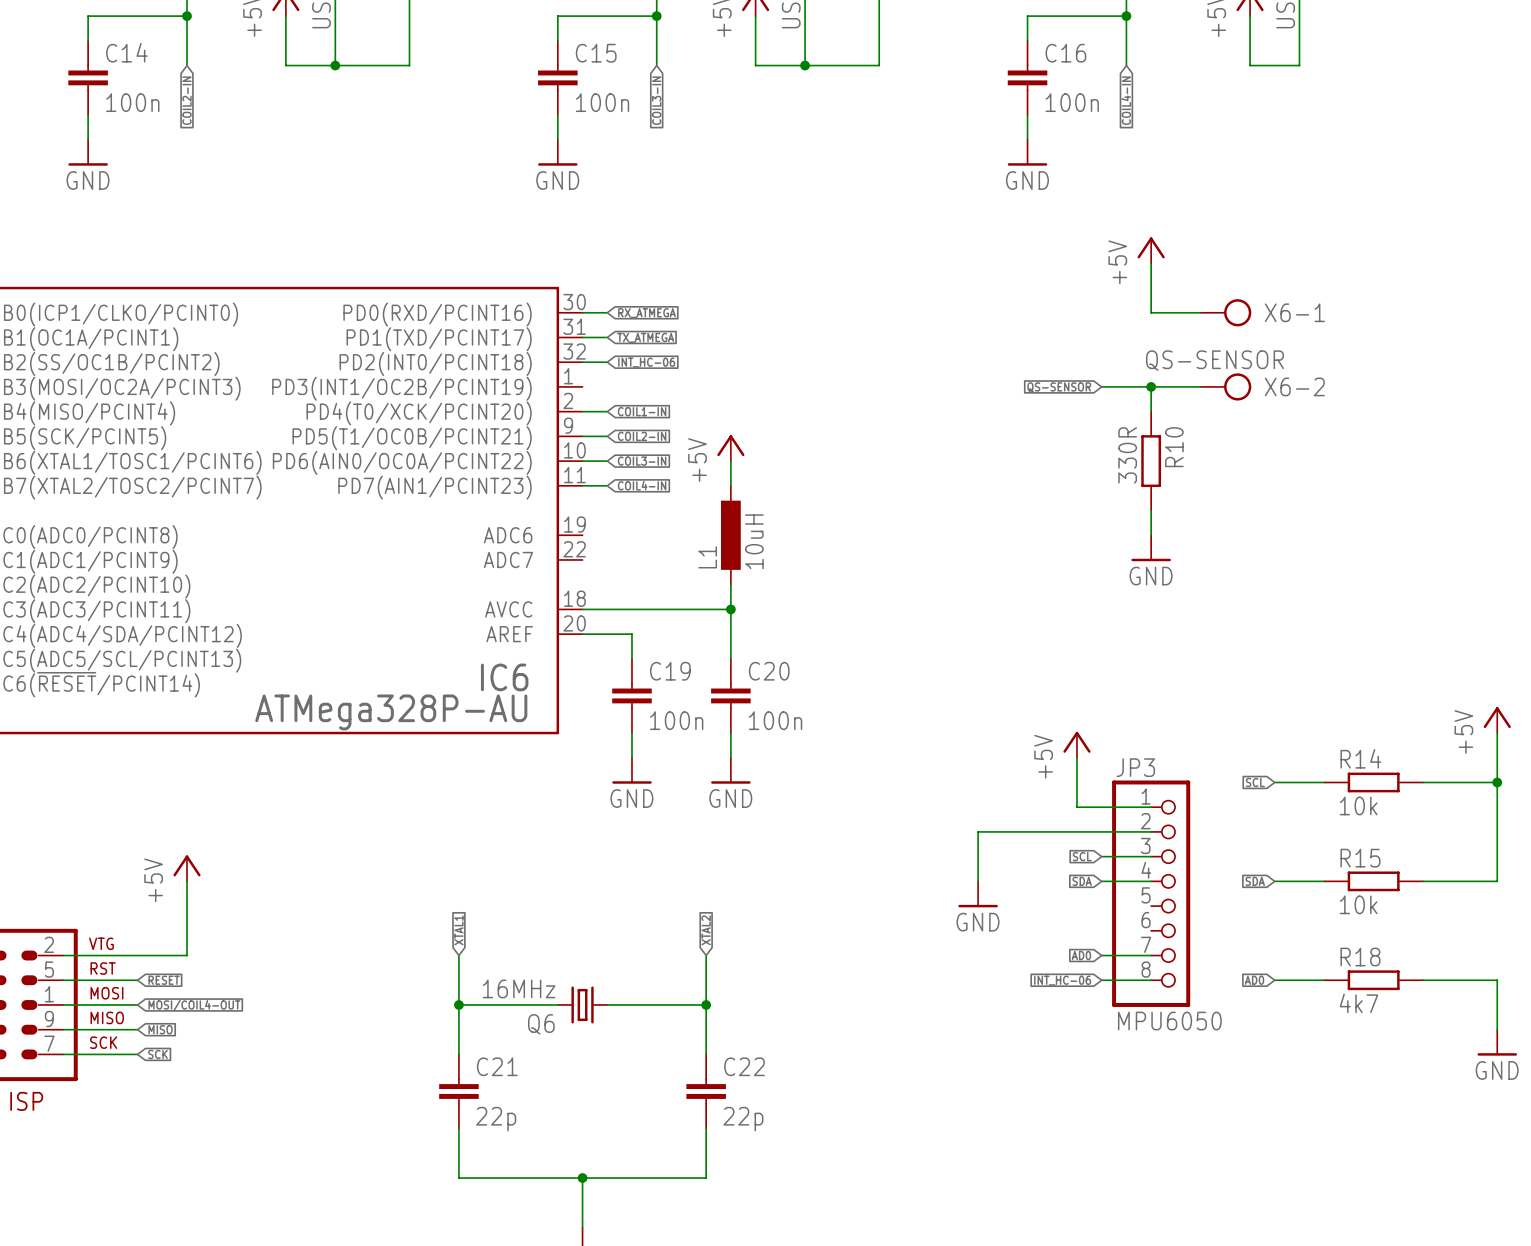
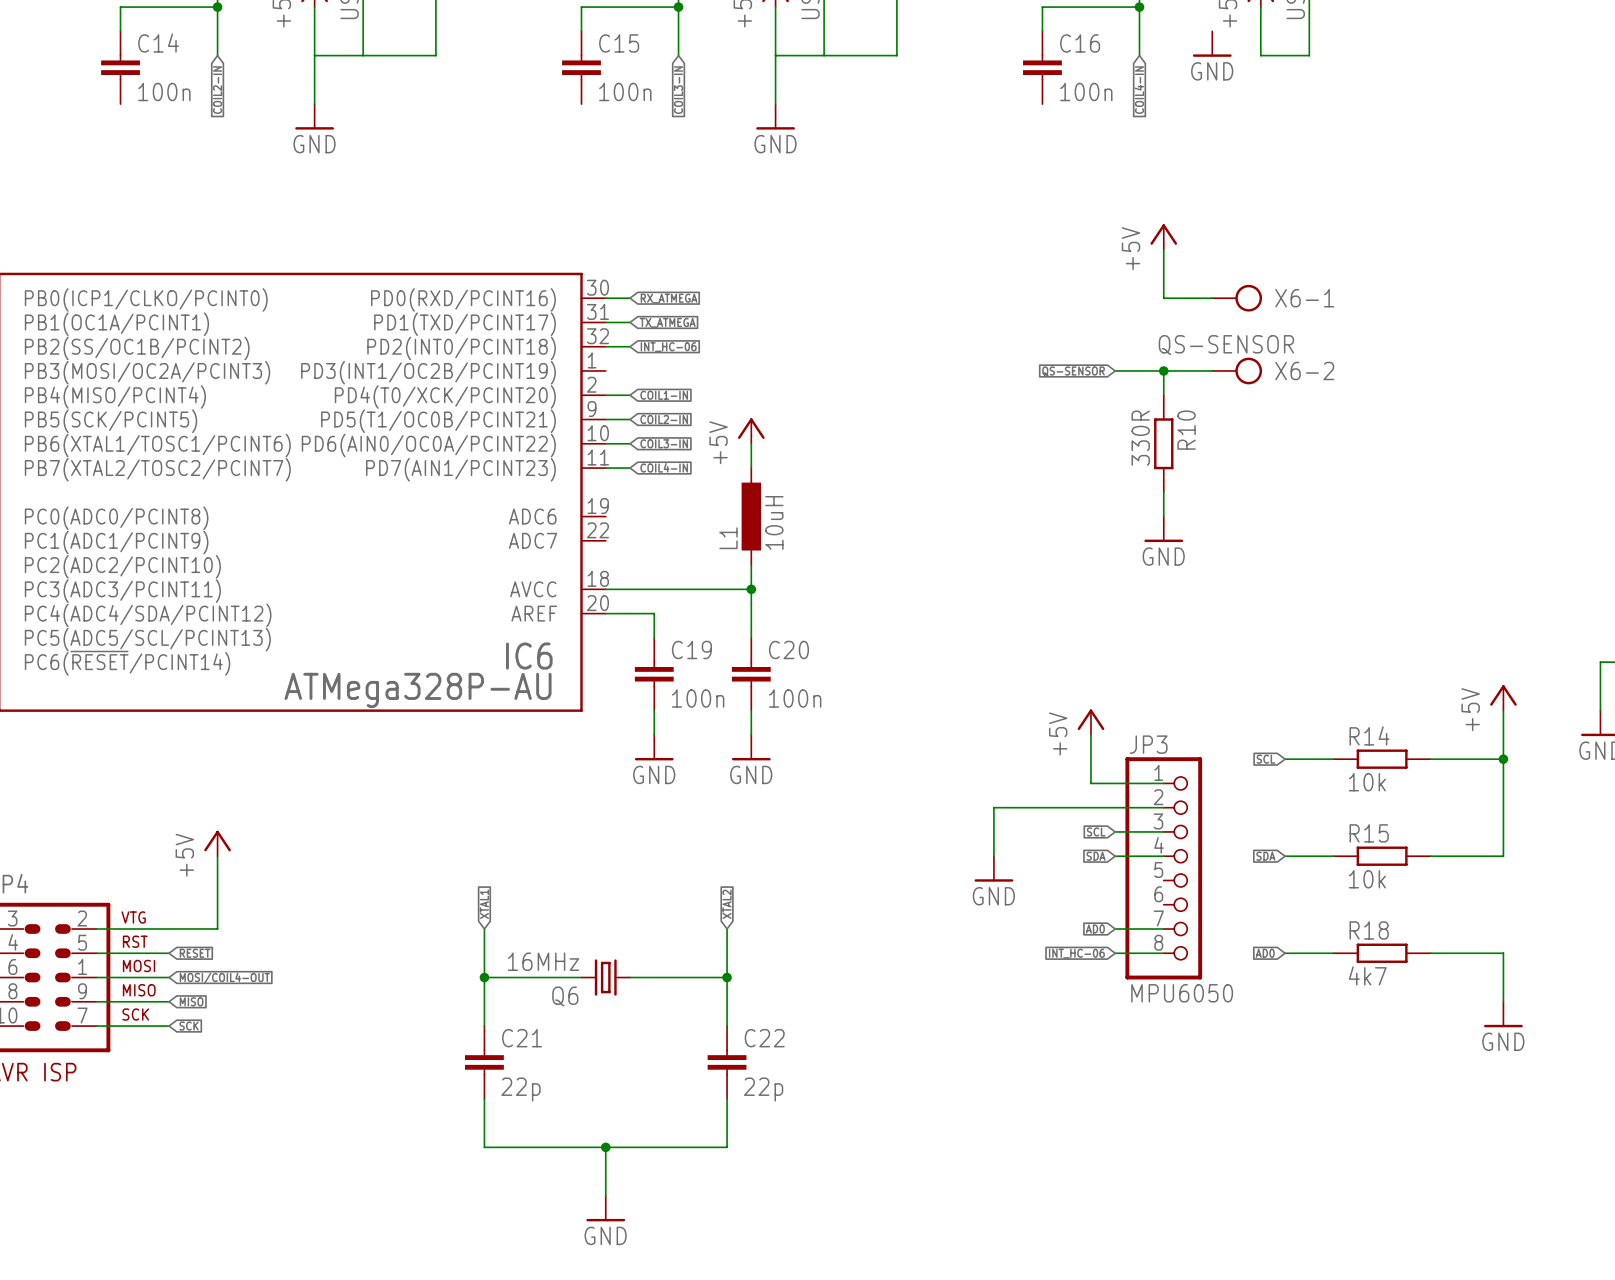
power symbol: none -> GND (1212, 44)
wire: none -> (314, 55) (314, 104)
junction: (335, 65) -> none
wire: none -> (775, 55) (775, 104)
junction: (805, 65) -> none
wire: (88, 114) (88, 139) -> none
wire: (557, 114) (557, 139) -> none
wire: (1027, 114) (1027, 139) -> none
power symbol: none -> GND (314, 116)
power symbol: none -> GND (775, 116)
power symbol: GND (88, 152) -> none
power symbol: GND (557, 152) -> none
power symbol: GND (1027, 152) -> none

